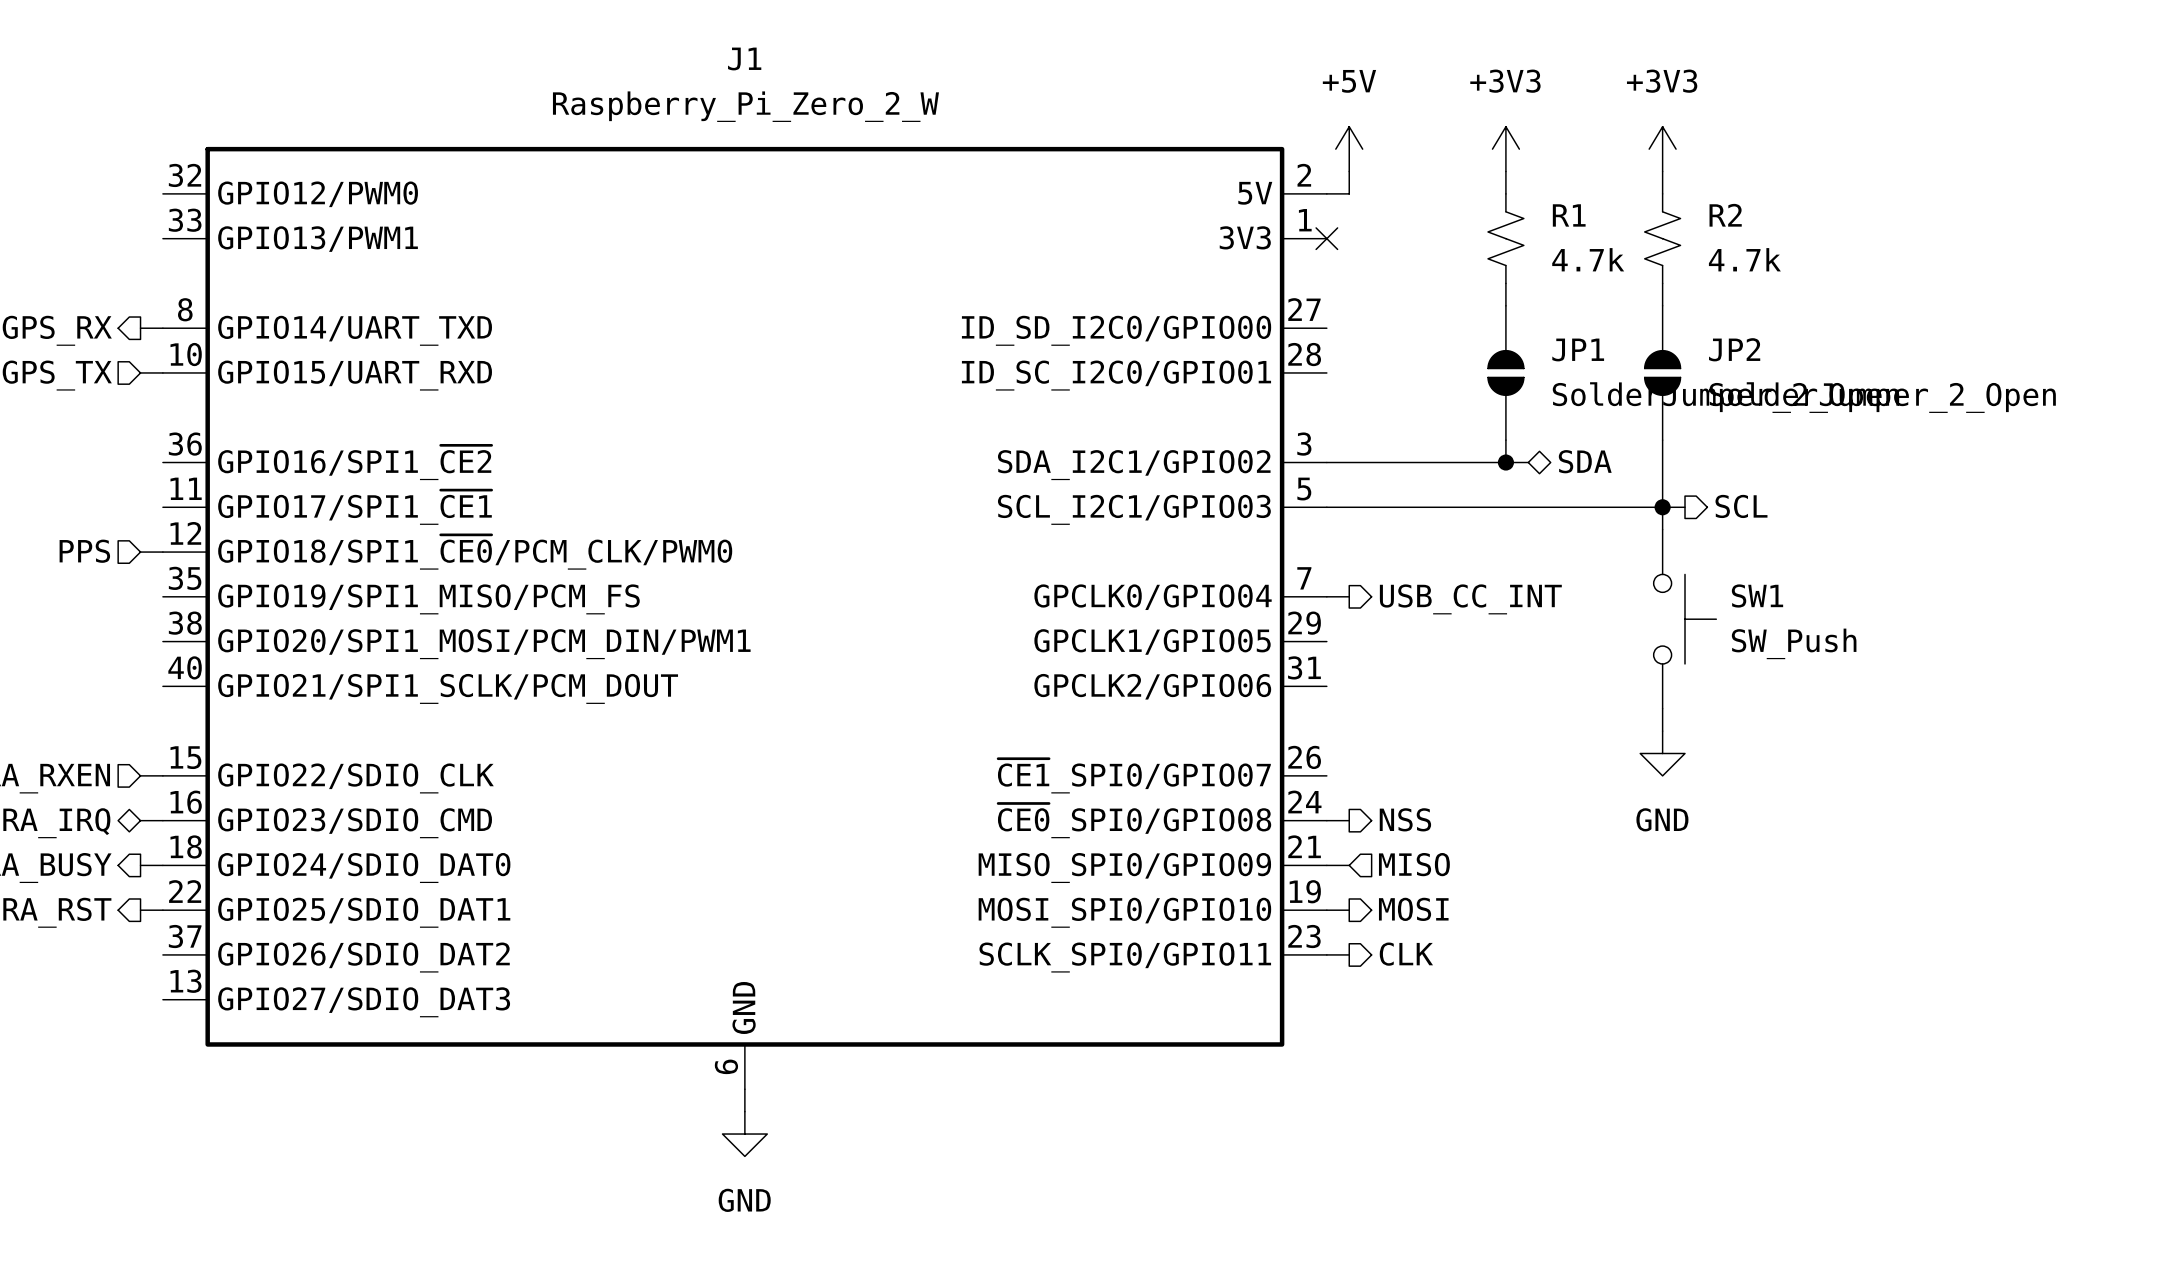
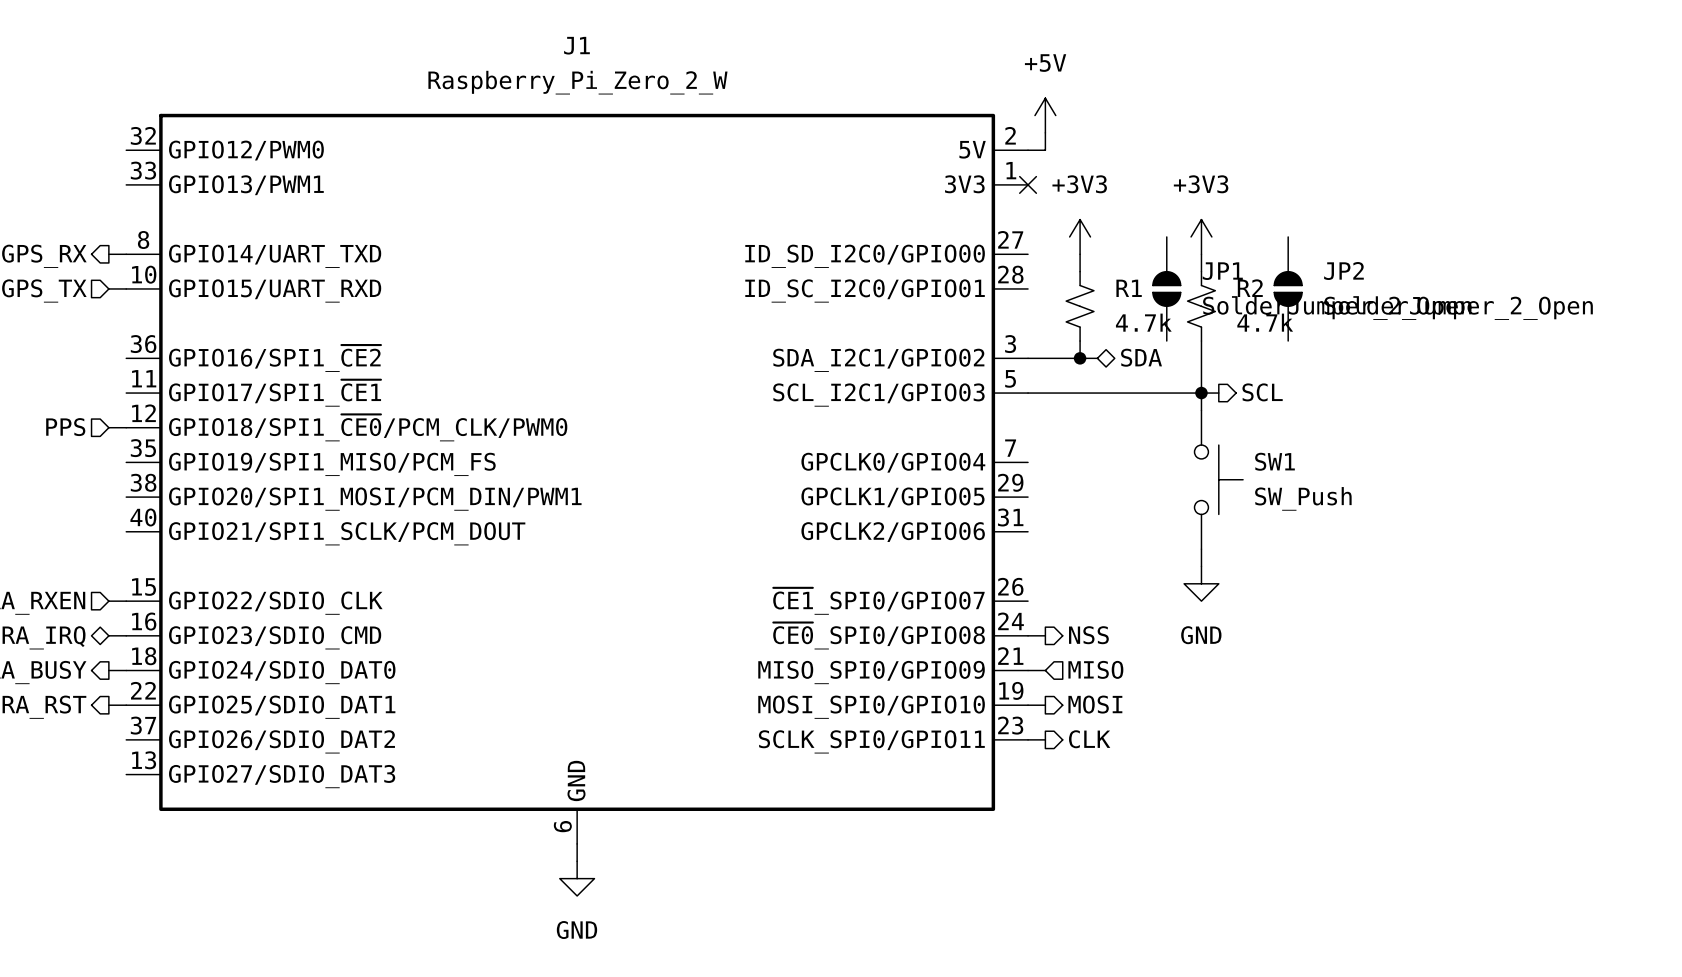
power symbol: +3V3 (1505, 149) -> none
power symbol: +3V3 (1662, 149) -> none
wire: (1505, 171) (1505, 193) -> (1080, 254) (1080, 271)
wire: (1662, 171) (1662, 193) -> (1201, 254) (1201, 271)
R1 position: (1505, 238) -> (1080, 306)
R2 position: (1662, 238) -> (1201, 306)
wire: (1505, 283) (1505, 305) -> none
wire: (1662, 283) (1662, 305) -> none
power symbol: none -> +3V3 (1080, 236)
power symbol: none -> +3V3 (1201, 236)
wire: (1505, 440) (1505, 462) -> (1080, 341) (1080, 358)
wire: (1662, 440) (1662, 529) -> (1201, 341) (1201, 410)
hierarchical label position: SDA (1585, 461) -> SDA (1141, 357)
junction: none -> (1080, 358)
wire: (1416, 462) (1528, 462) -> none
junction: (1505, 462) -> none
hierarchical label position: SCL (1741, 506) -> SCL (1262, 392)
junction: none -> (1201, 393)
wire: (1573, 507) (1685, 507) -> none
junction: (1662, 507) -> none
wire: (1326, 596) (1349, 596) -> none
hierarchical label: USB_CC_INT (1470, 599) -> none
SW1 position: (1685, 619) -> (1218, 479)
wire: (1662, 708) (1662, 731) -> (1201, 549) (1201, 566)
power symbol position: GND (1662, 753) -> GND (1201, 583)

